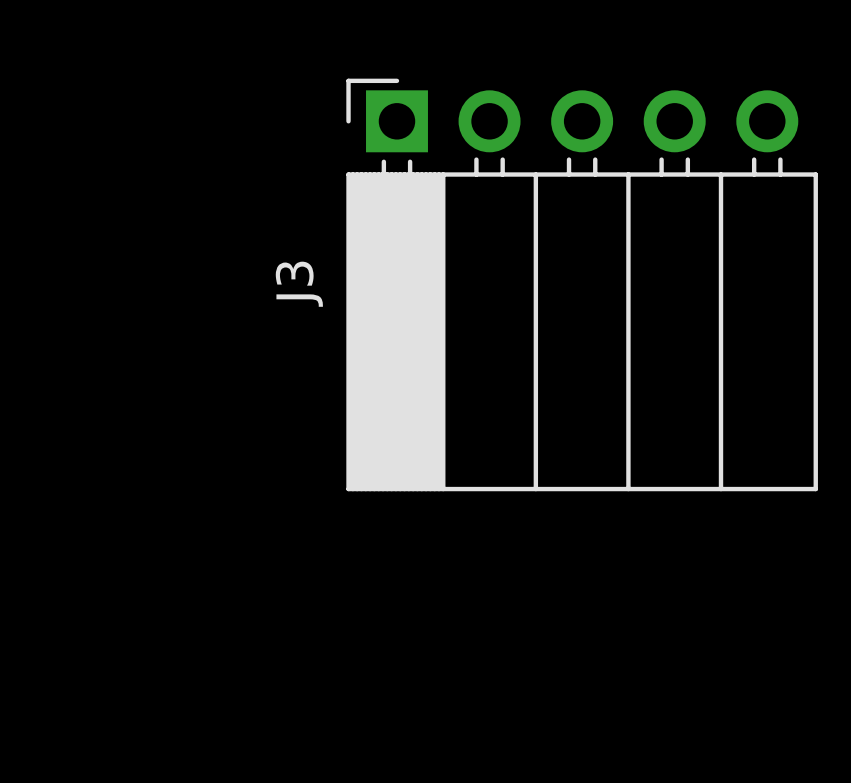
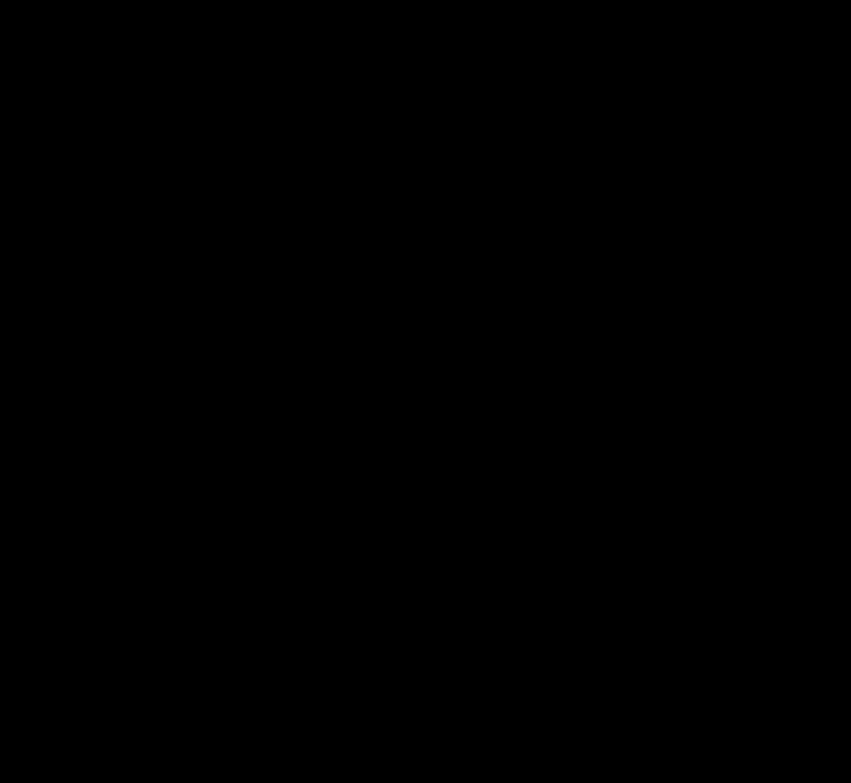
J3: (582, 284) -> none

